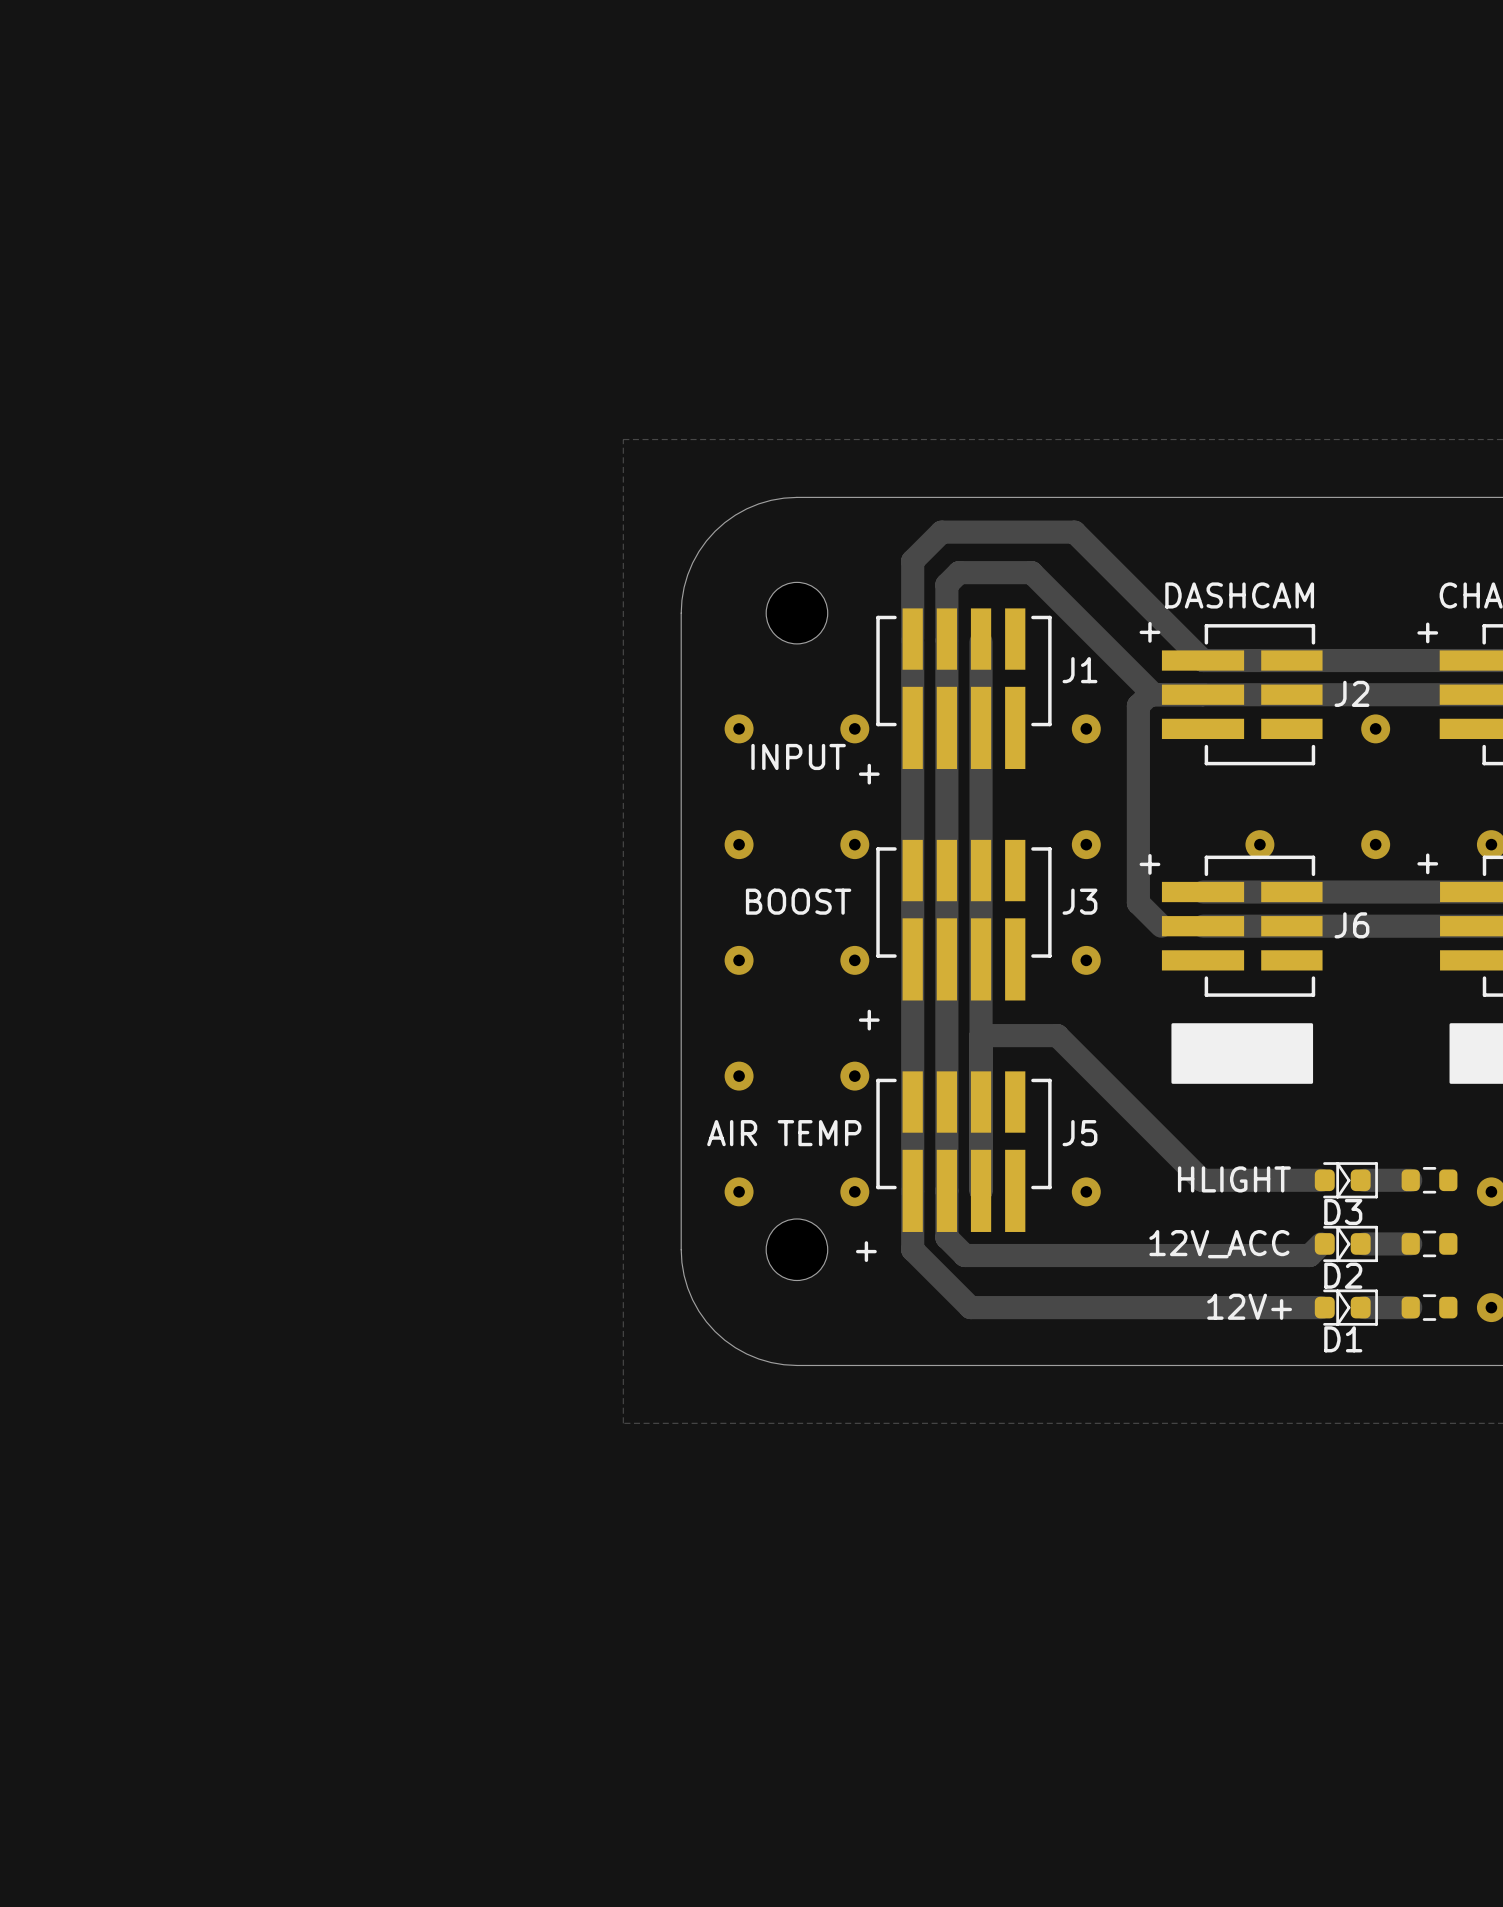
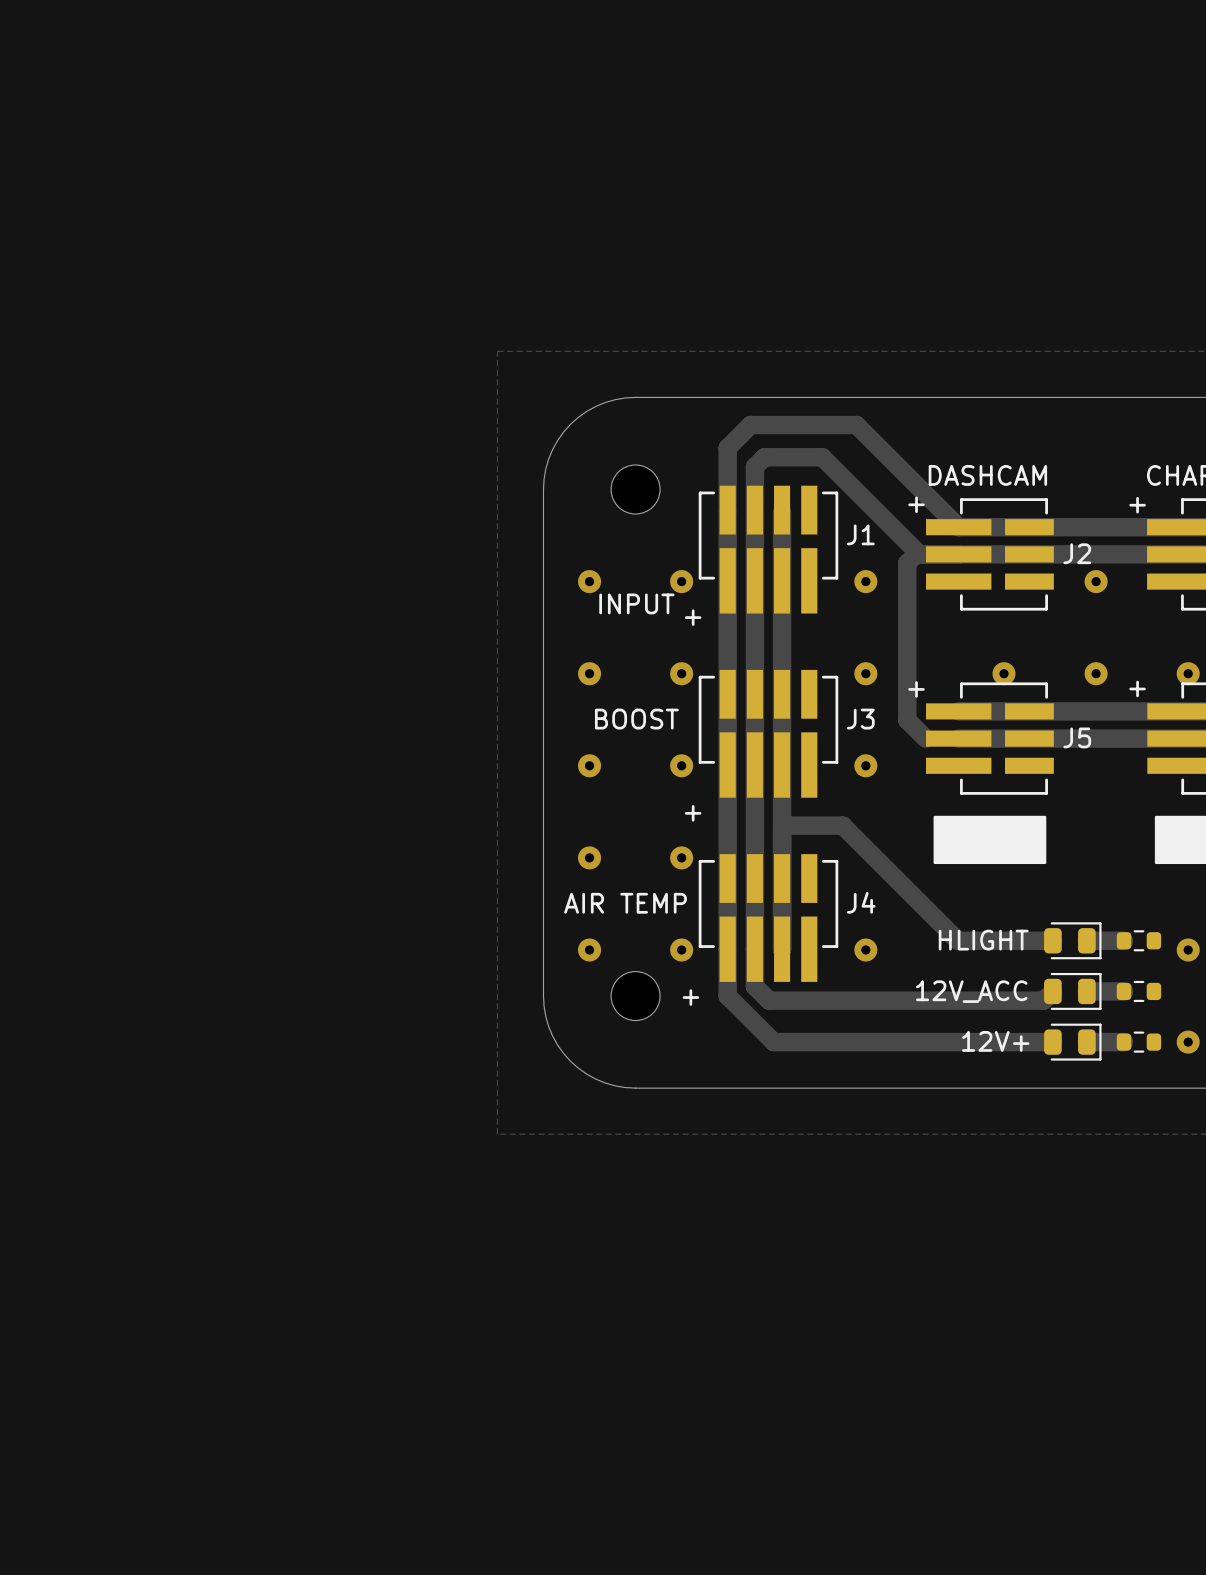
J6 name: J6 (1351, 925) -> J5 (1077, 737)
J5 name: J5 (1079, 1133) -> J4 (861, 902)
D3: (1346, 1180) -> none
part: none -> (1072, 940)
part: none -> (1072, 991)
D2: (1346, 1244) -> none
D1: (1346, 1307) -> none
part: none -> (1072, 1042)

